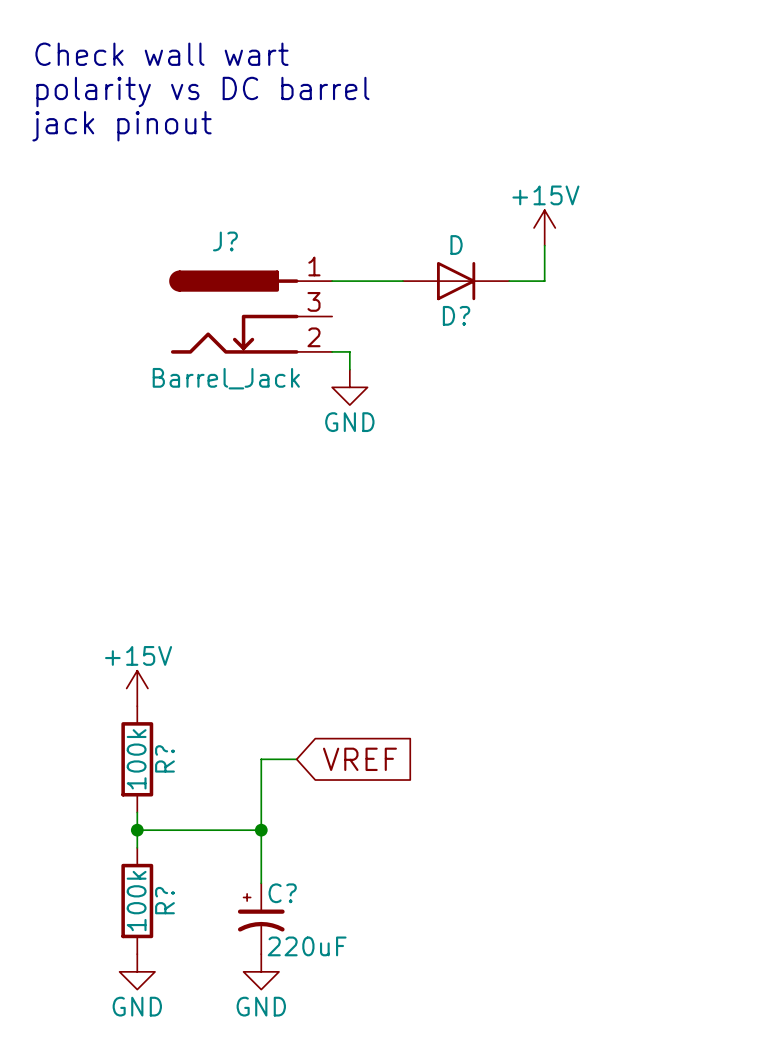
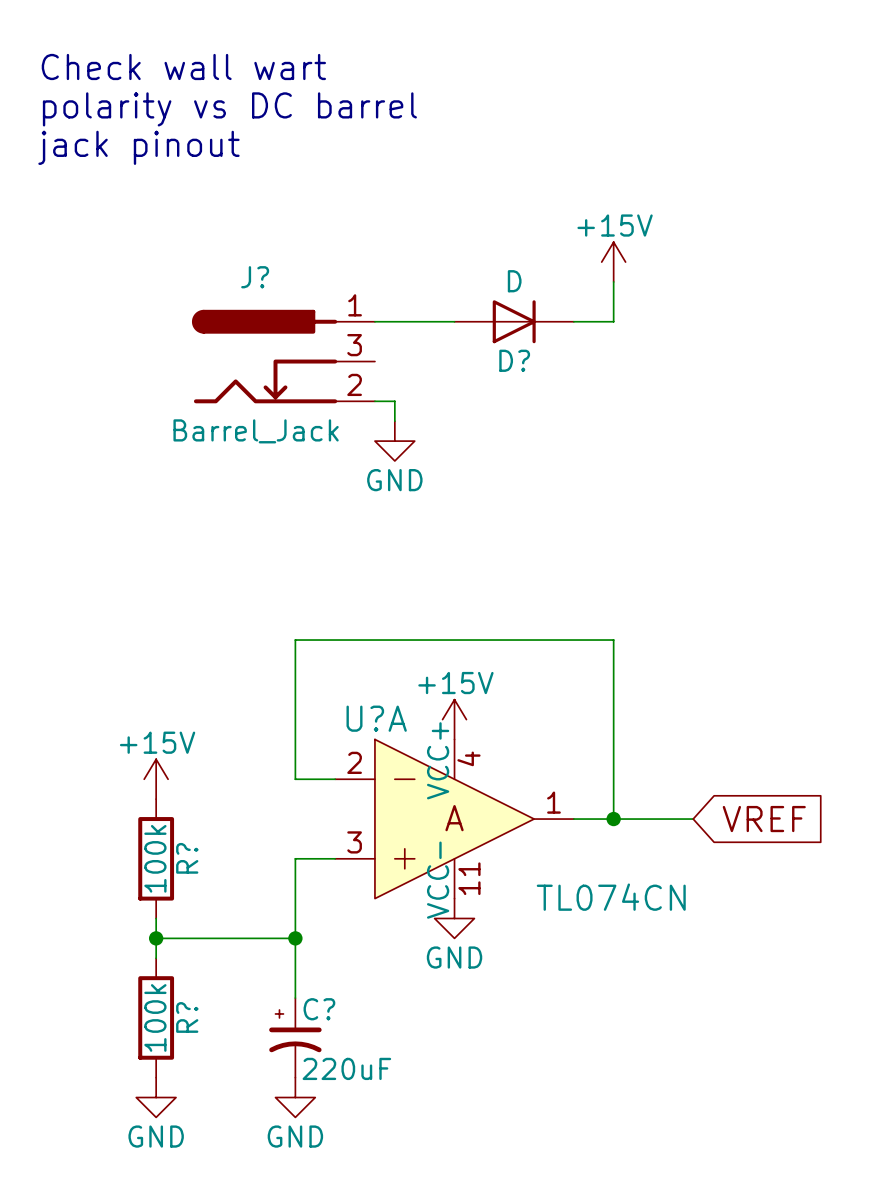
power symbol: none -> +15V (454, 719)
wire: none -> (335, 779) (295, 779) (295, 640) (613, 640) (613, 819)
U?A: none -> TL074CN (454, 819)
wire: none -> (573, 819) (693, 819)
junction: none -> (613, 819)
global label position: VREF (359, 759) -> VREF (764, 819)
power symbol: none -> GND (454, 918)

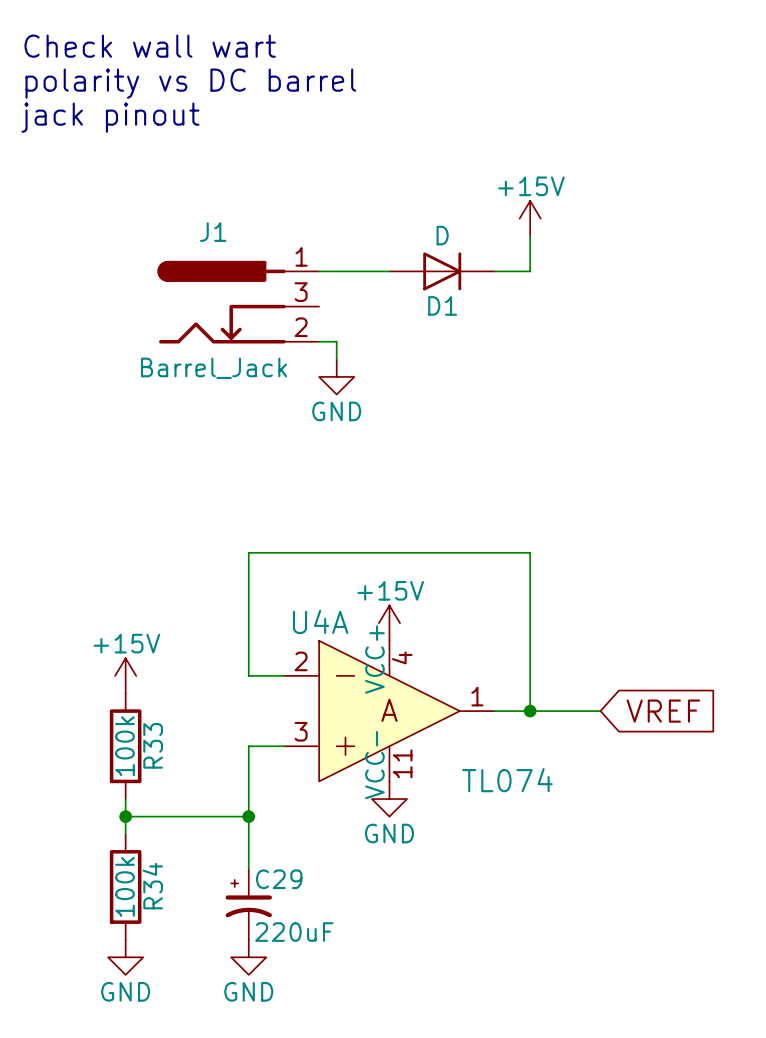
J? name: J? (255, 277) -> J1 (213, 232)
D? name: D? (514, 360) -> D1 (442, 305)
U?A name: U?A (376, 718) -> U4A (320, 621)
R? name: R? (187, 858) -> R33 (153, 745)
U?A value: TL074CN (611, 897) -> TL074 (507, 780)
C? name: C? (319, 1009) -> C29 (279, 879)
R? name: R? (187, 1017) -> R34 (152, 886)

